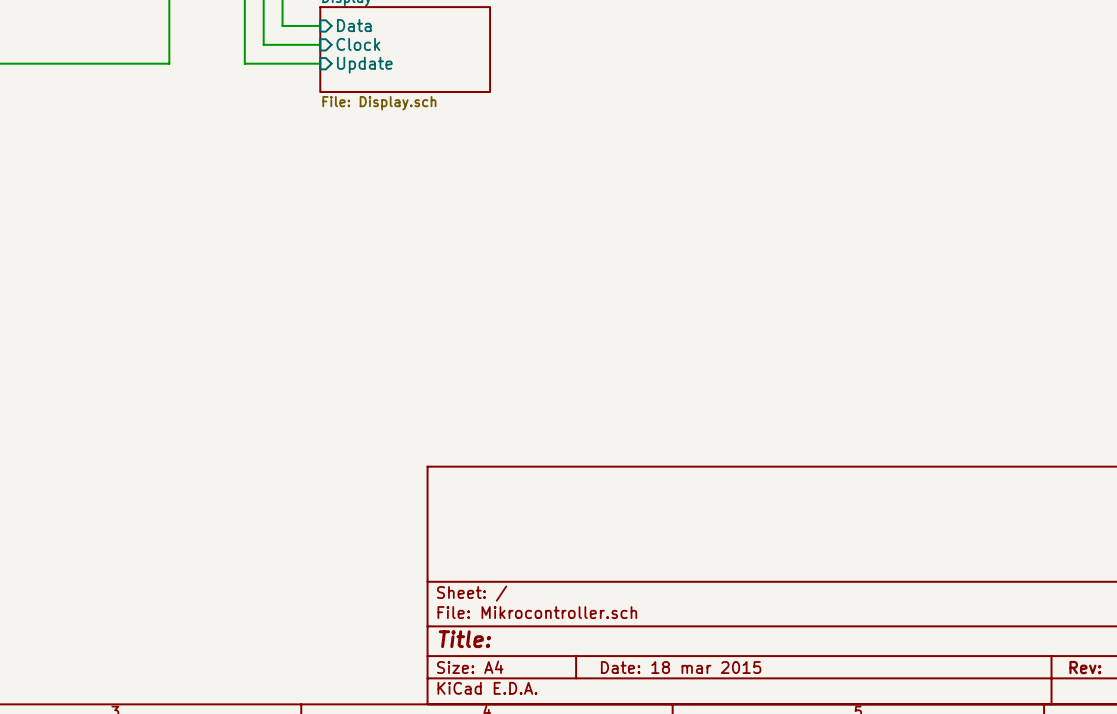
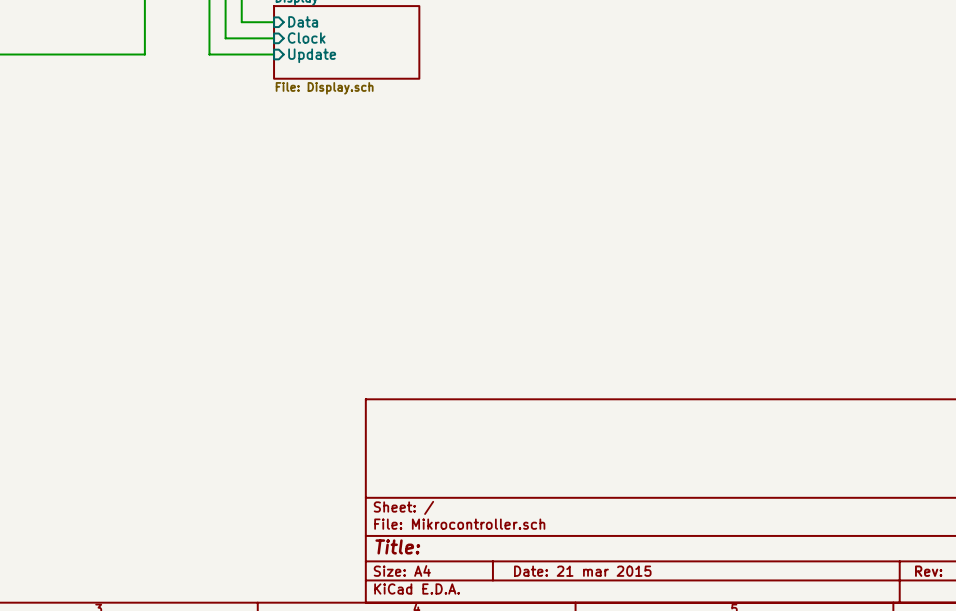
title block: Date: 18 mar 2015 (681, 667) -> Date: 21 mar 2015 (582, 571)

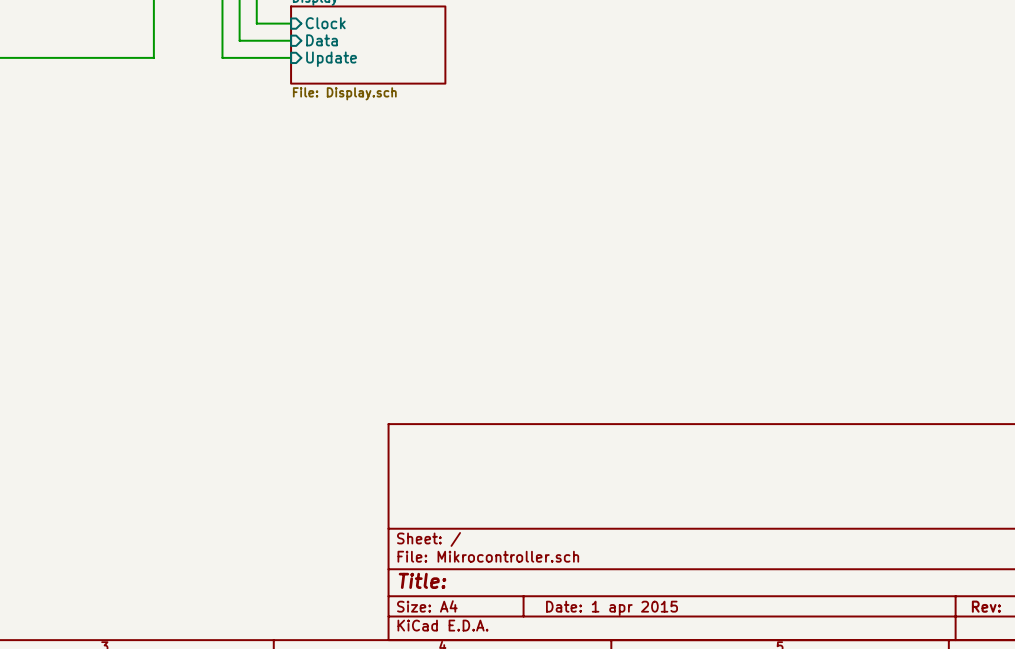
sheet pin: Data (303, 21) -> Clock (325, 23)
sheet pin: Clock (306, 38) -> Data (321, 40)
title block: Date: 21 mar 2015 (582, 571) -> Date: 1 apr 2015 (612, 608)

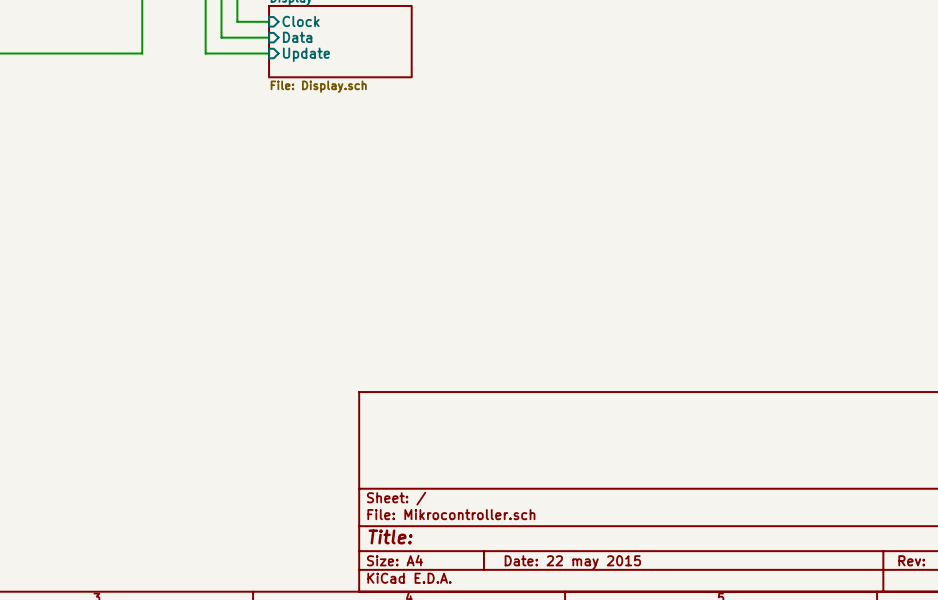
title block: Date: 1 apr 2015 (612, 608) -> Date: 22 may 2015 (572, 562)

